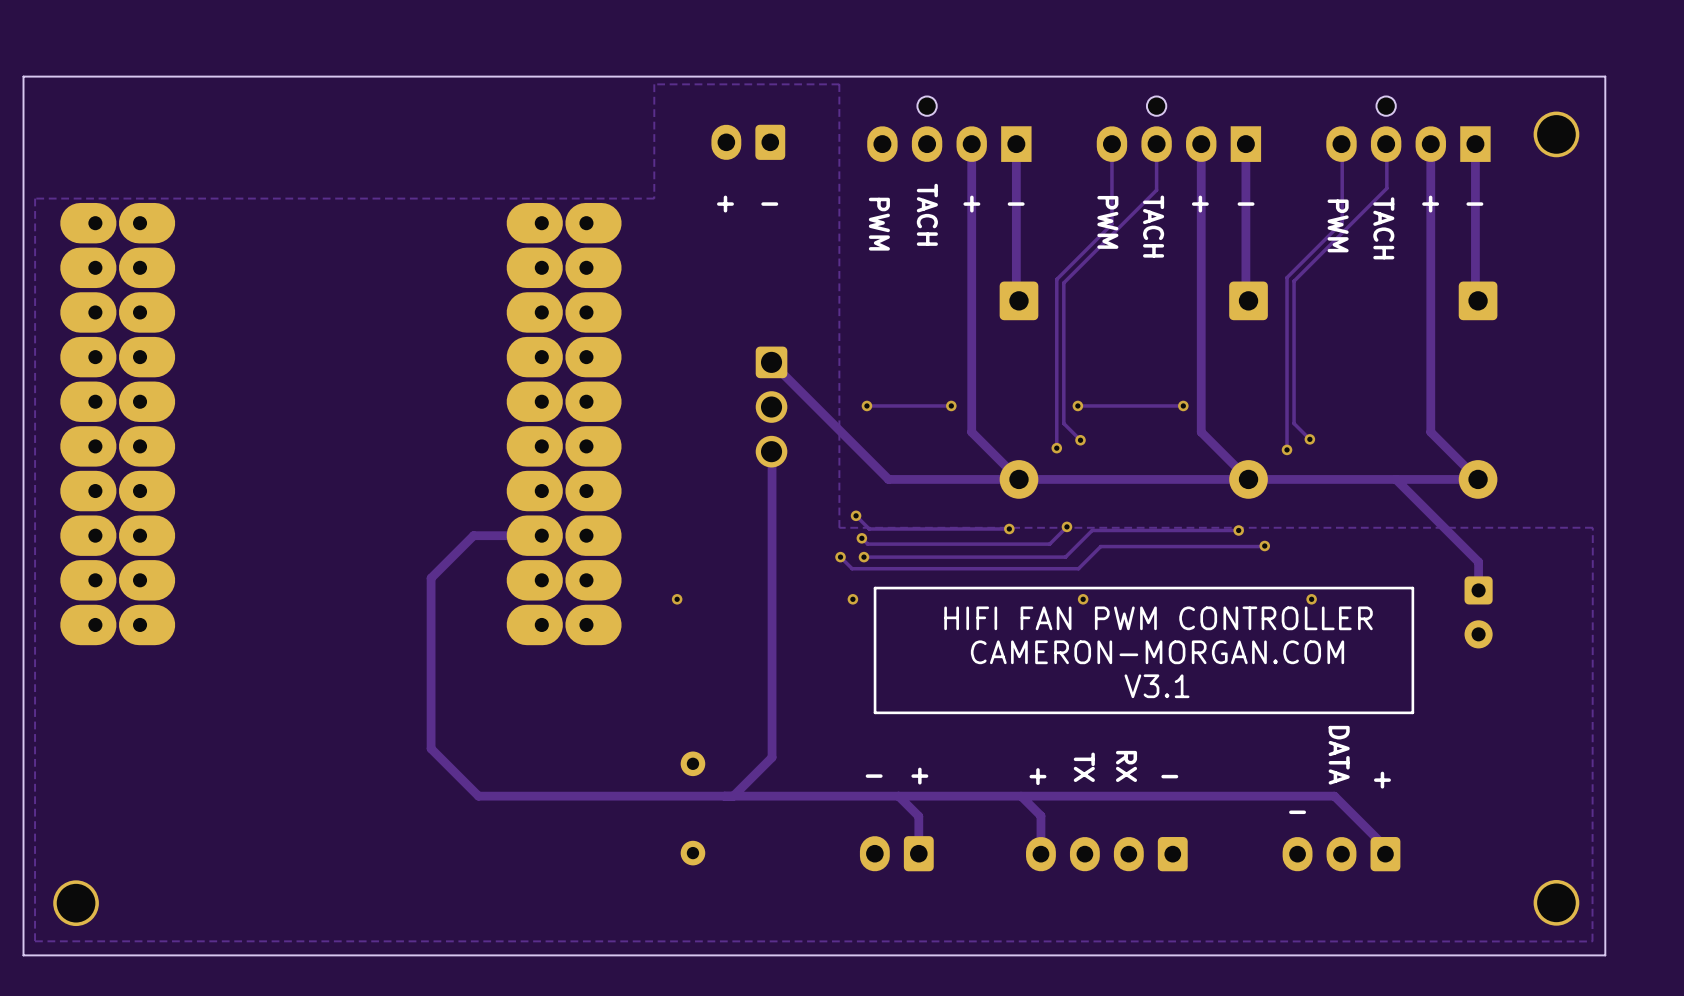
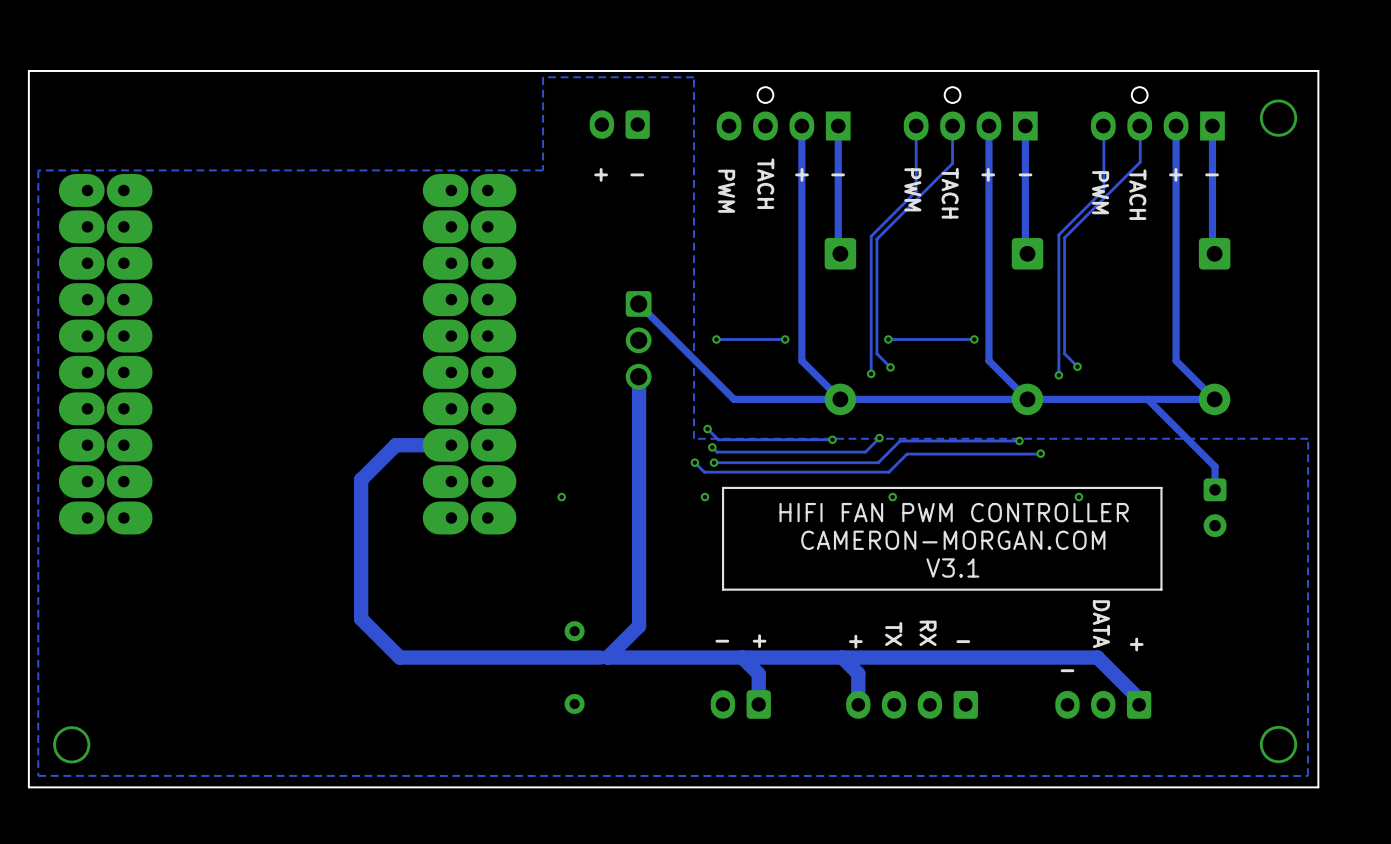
track width: thin (772, 452) (772, 757) (733, 796) (1334, 796) (1385, 847) -> thick (639, 377) (639, 626) (607, 657) (1097, 657) (1139, 699)
track width: thin (541, 535) (473, 535) (431, 578) (431, 748) (478, 796) (724, 796) -> thick (451, 445) (395, 445) (361, 479) (361, 618) (399, 657) (600, 657)
track width: thin (898, 796) (918, 816) (918, 853) -> thick (742, 657) (758, 674) (758, 704)
track width: thin (1021, 796) (1040, 815) (1040, 854) -> thick (842, 657) (858, 673) (858, 704)

